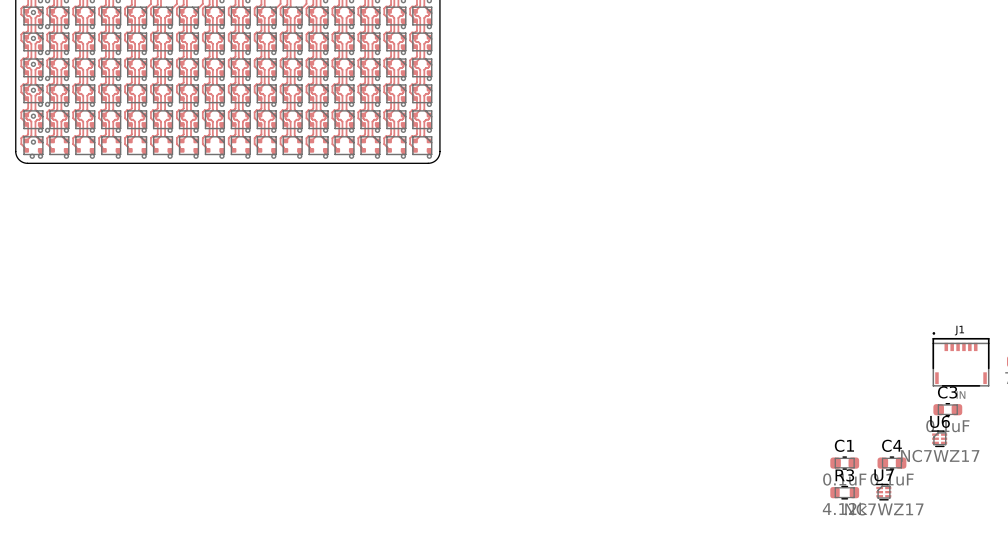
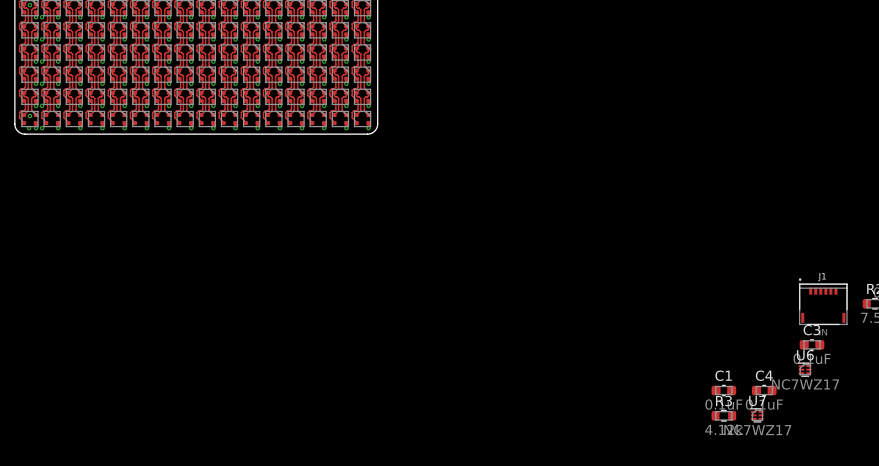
via: (33, 38) -> none
via: (33, 64) -> none
via: (33, 90) -> none
via: (33, 116) -> none
via: none -> (42, 128)

